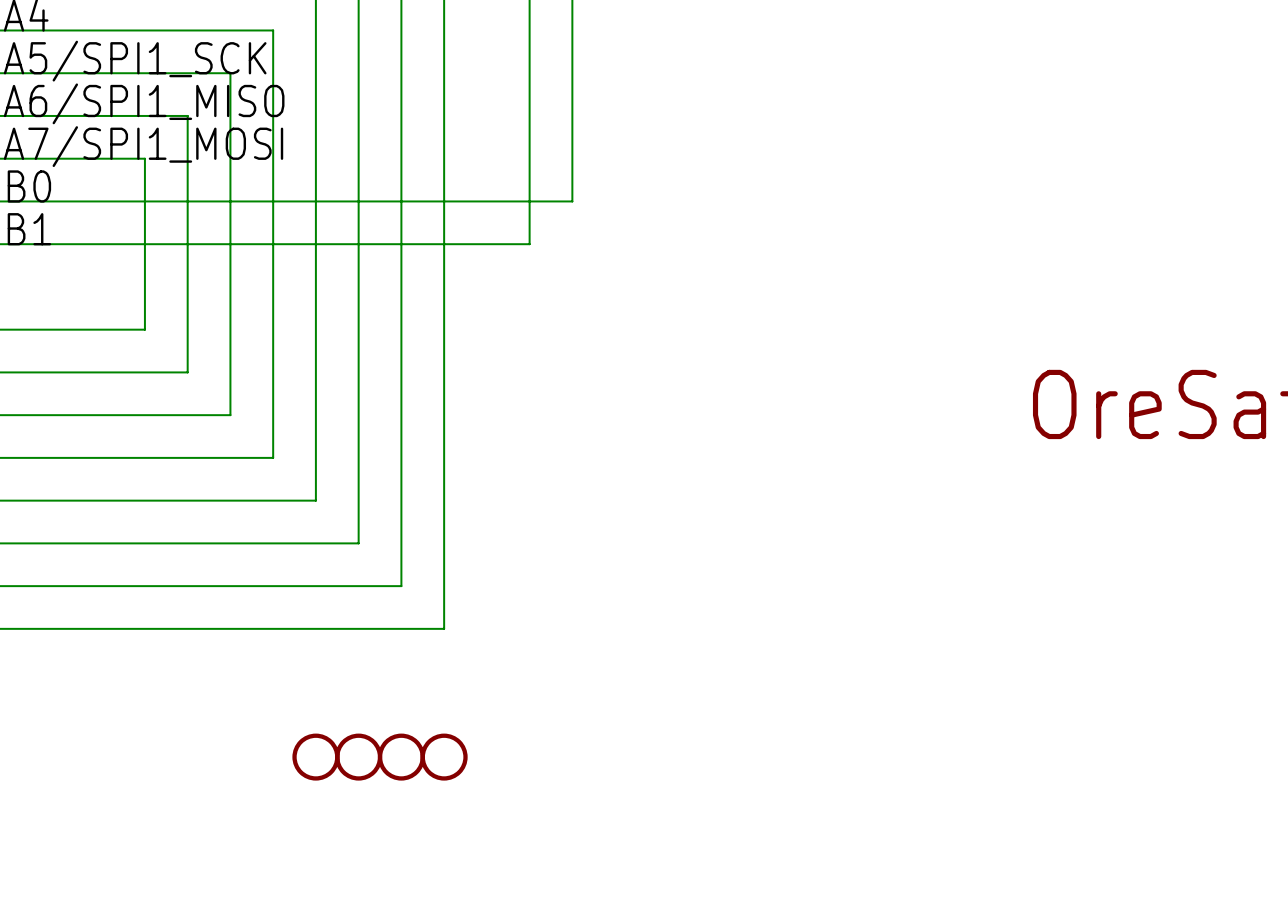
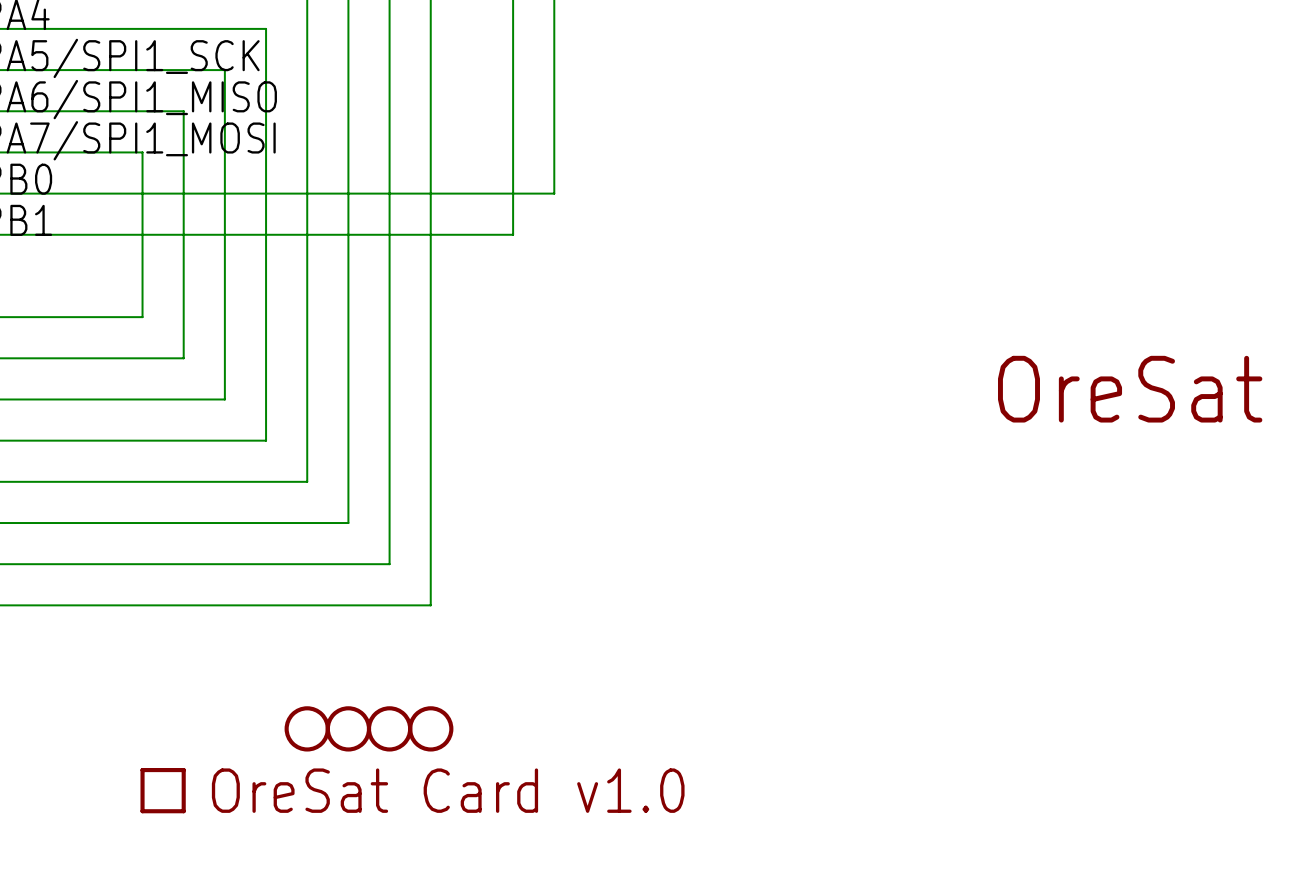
part: none -> (163, 790)

